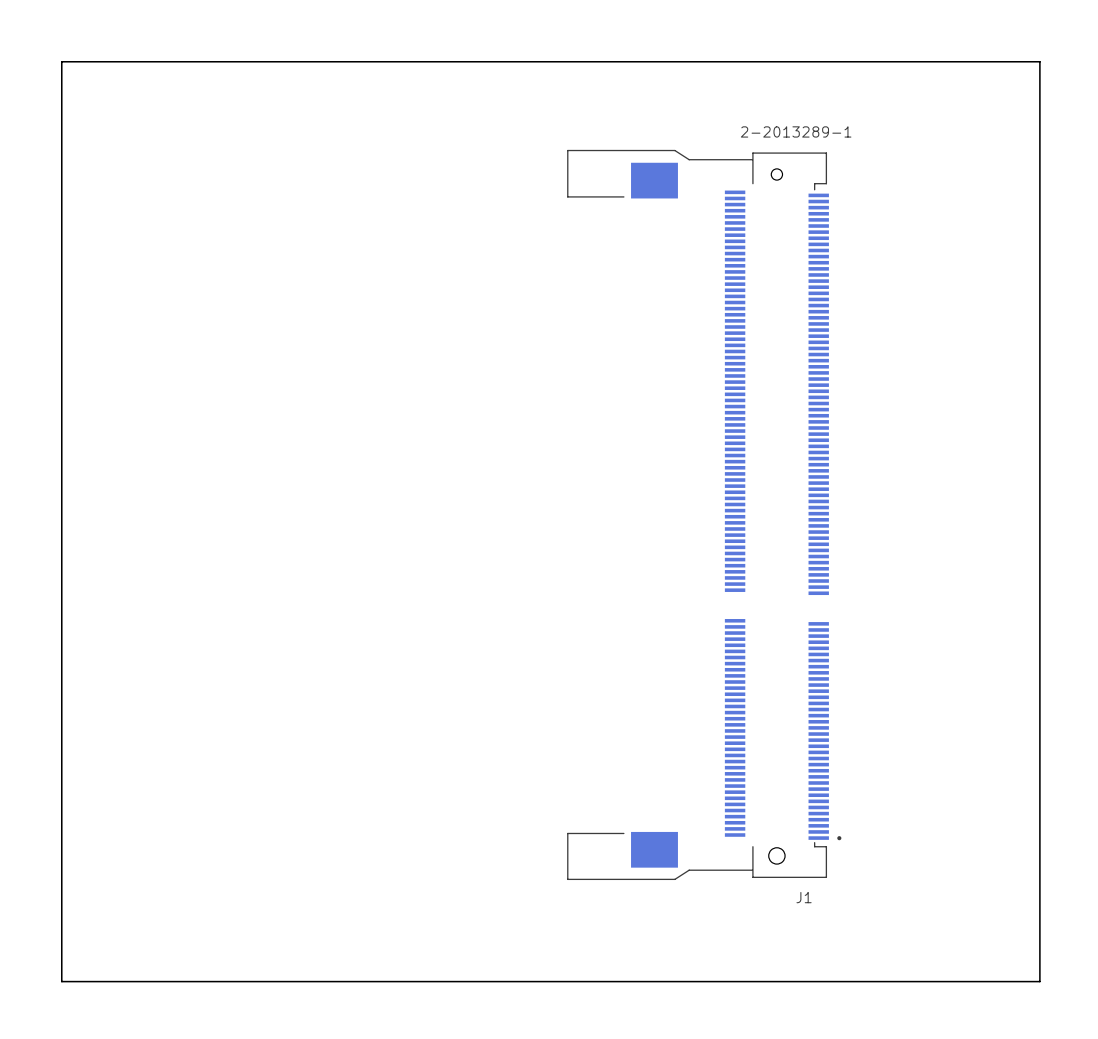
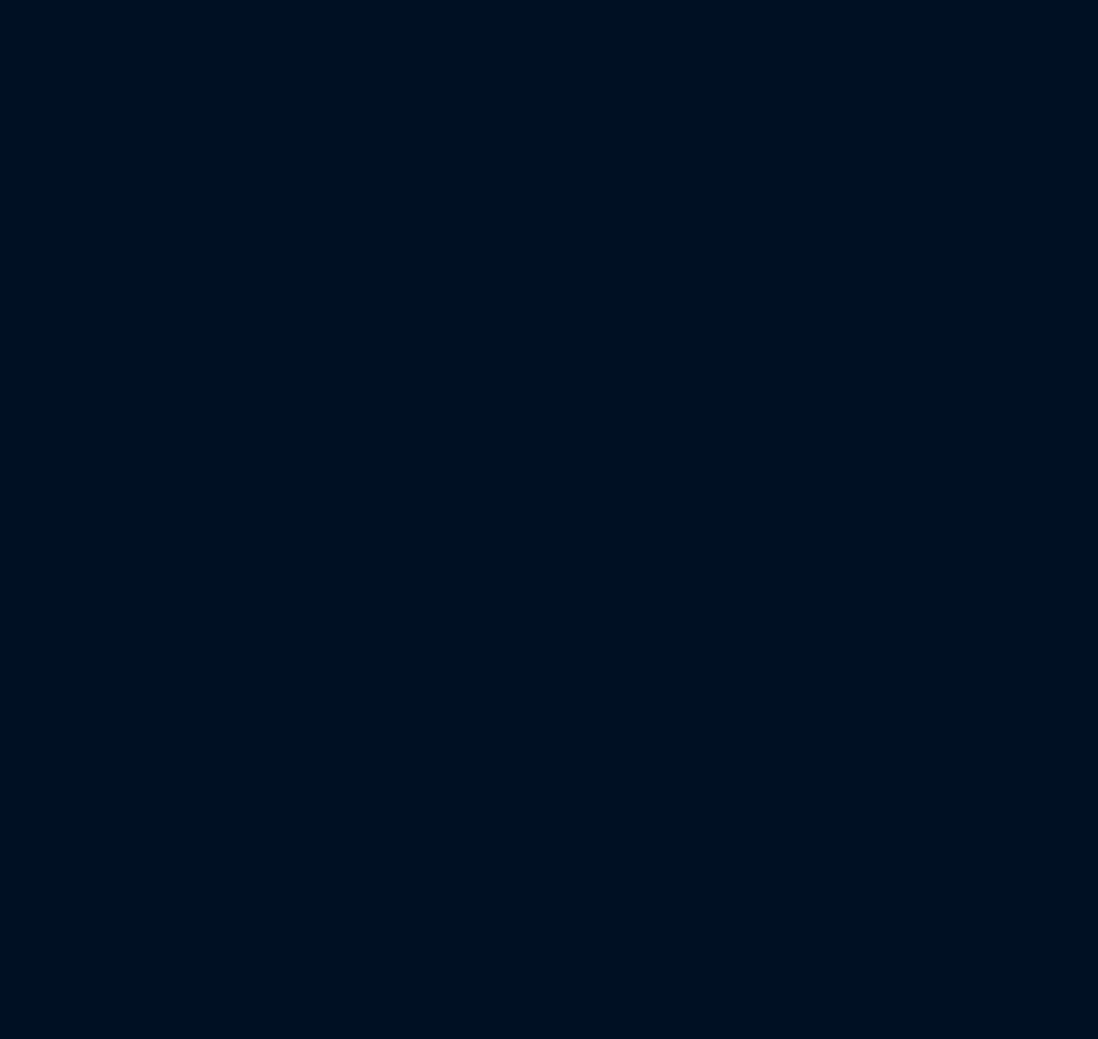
board edge: (1039, 61) (61, 61) (61, 981) (1039, 981) (1039, 61) -> none
J1: 2-2013289-1 (704, 514) -> none

